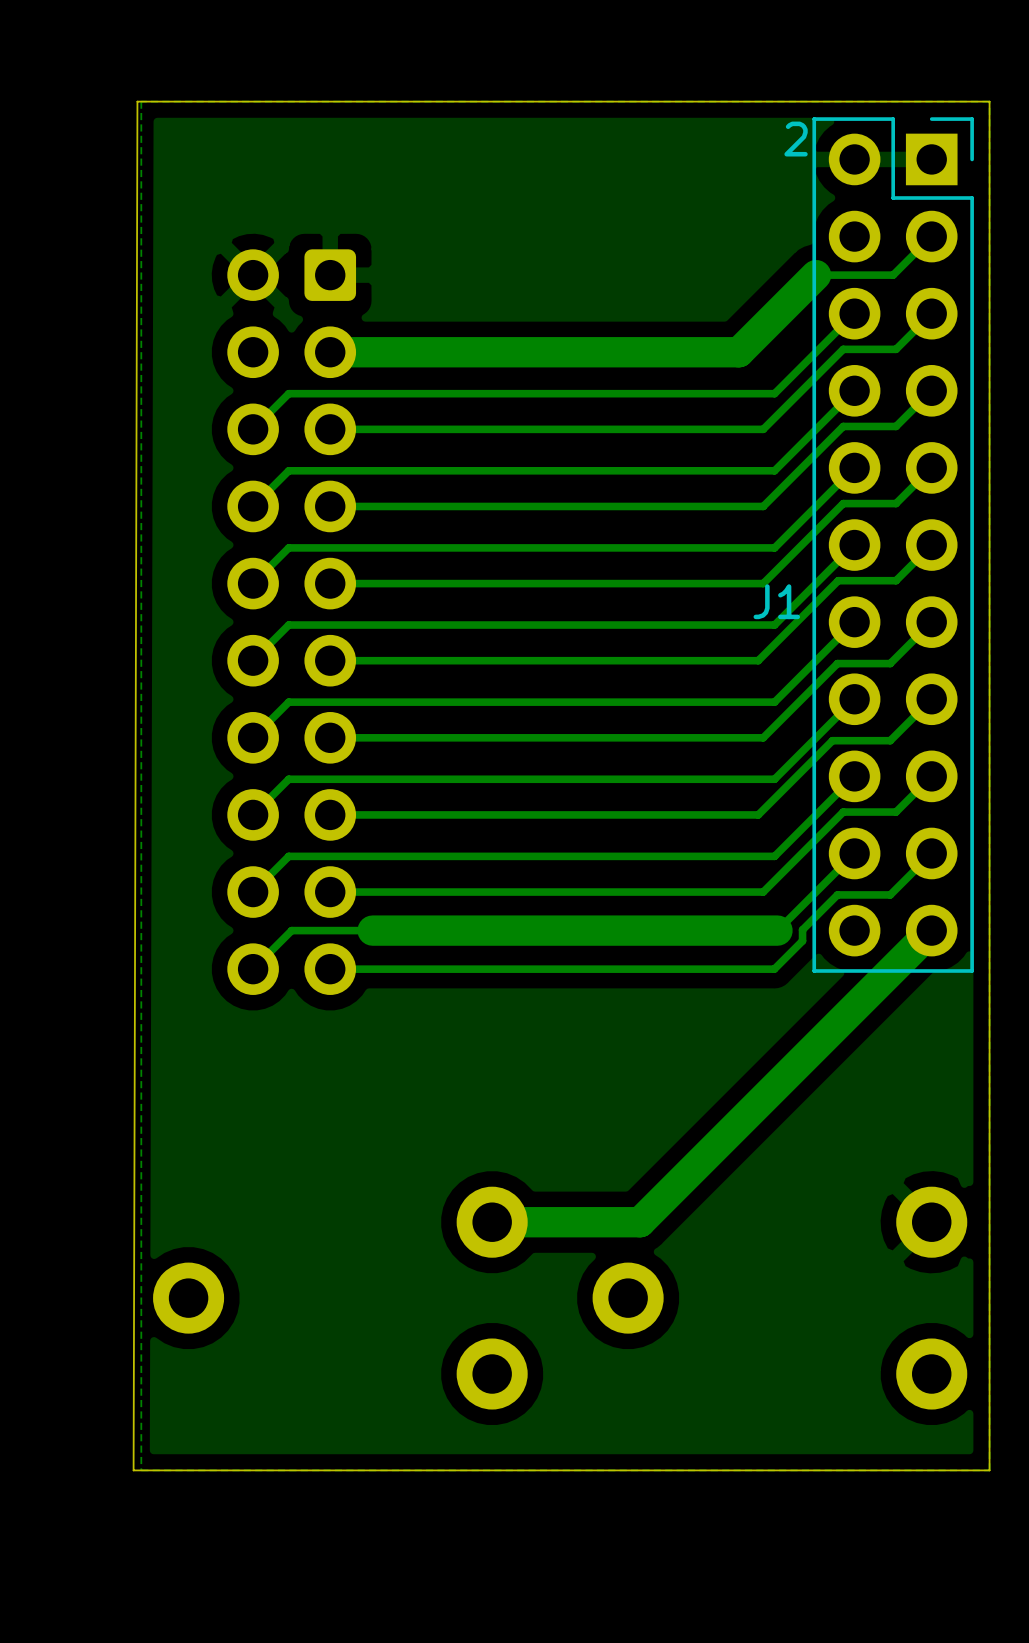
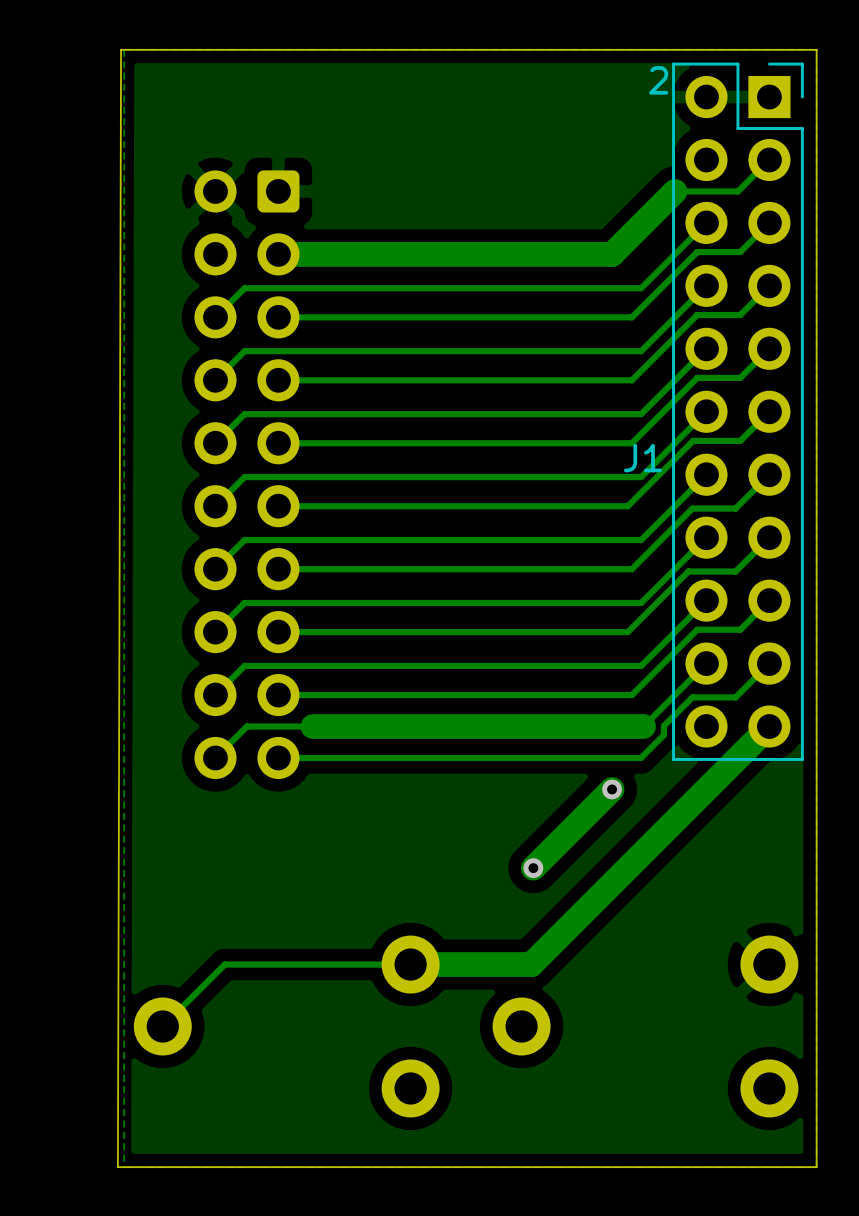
track: none -> (612, 789) (533, 868)
via: none -> (612, 789)
via: none -> (533, 868)
track: none -> (410, 964) (224, 964) (162, 1026)

